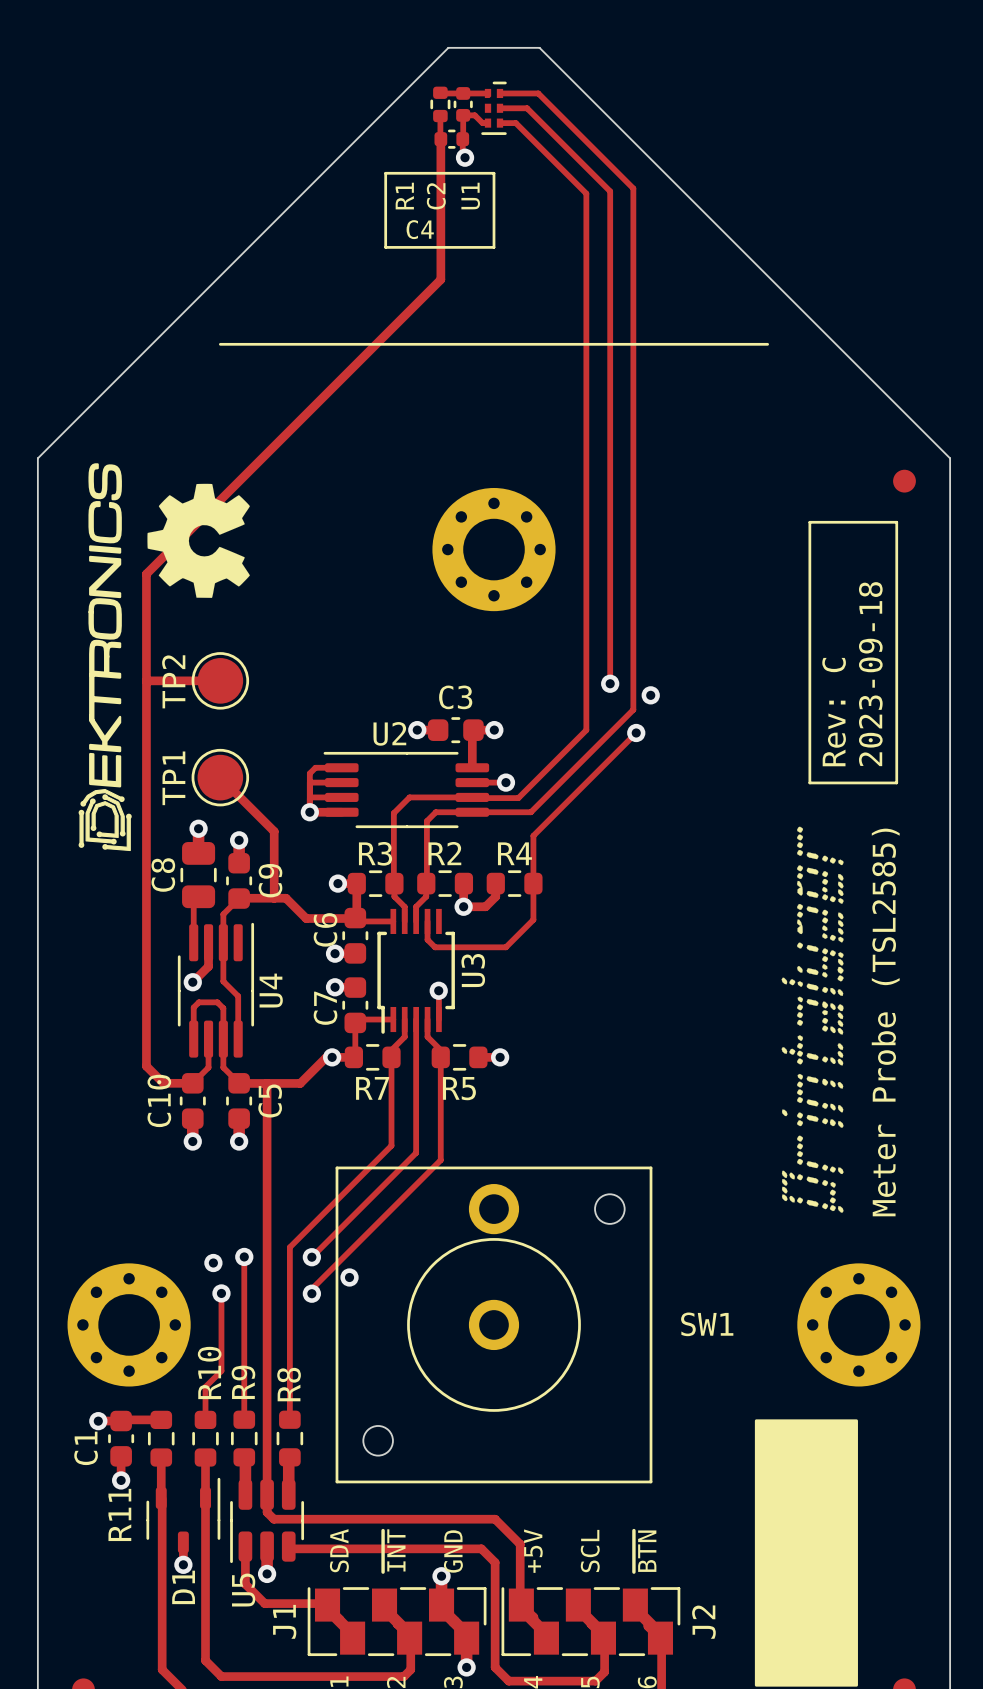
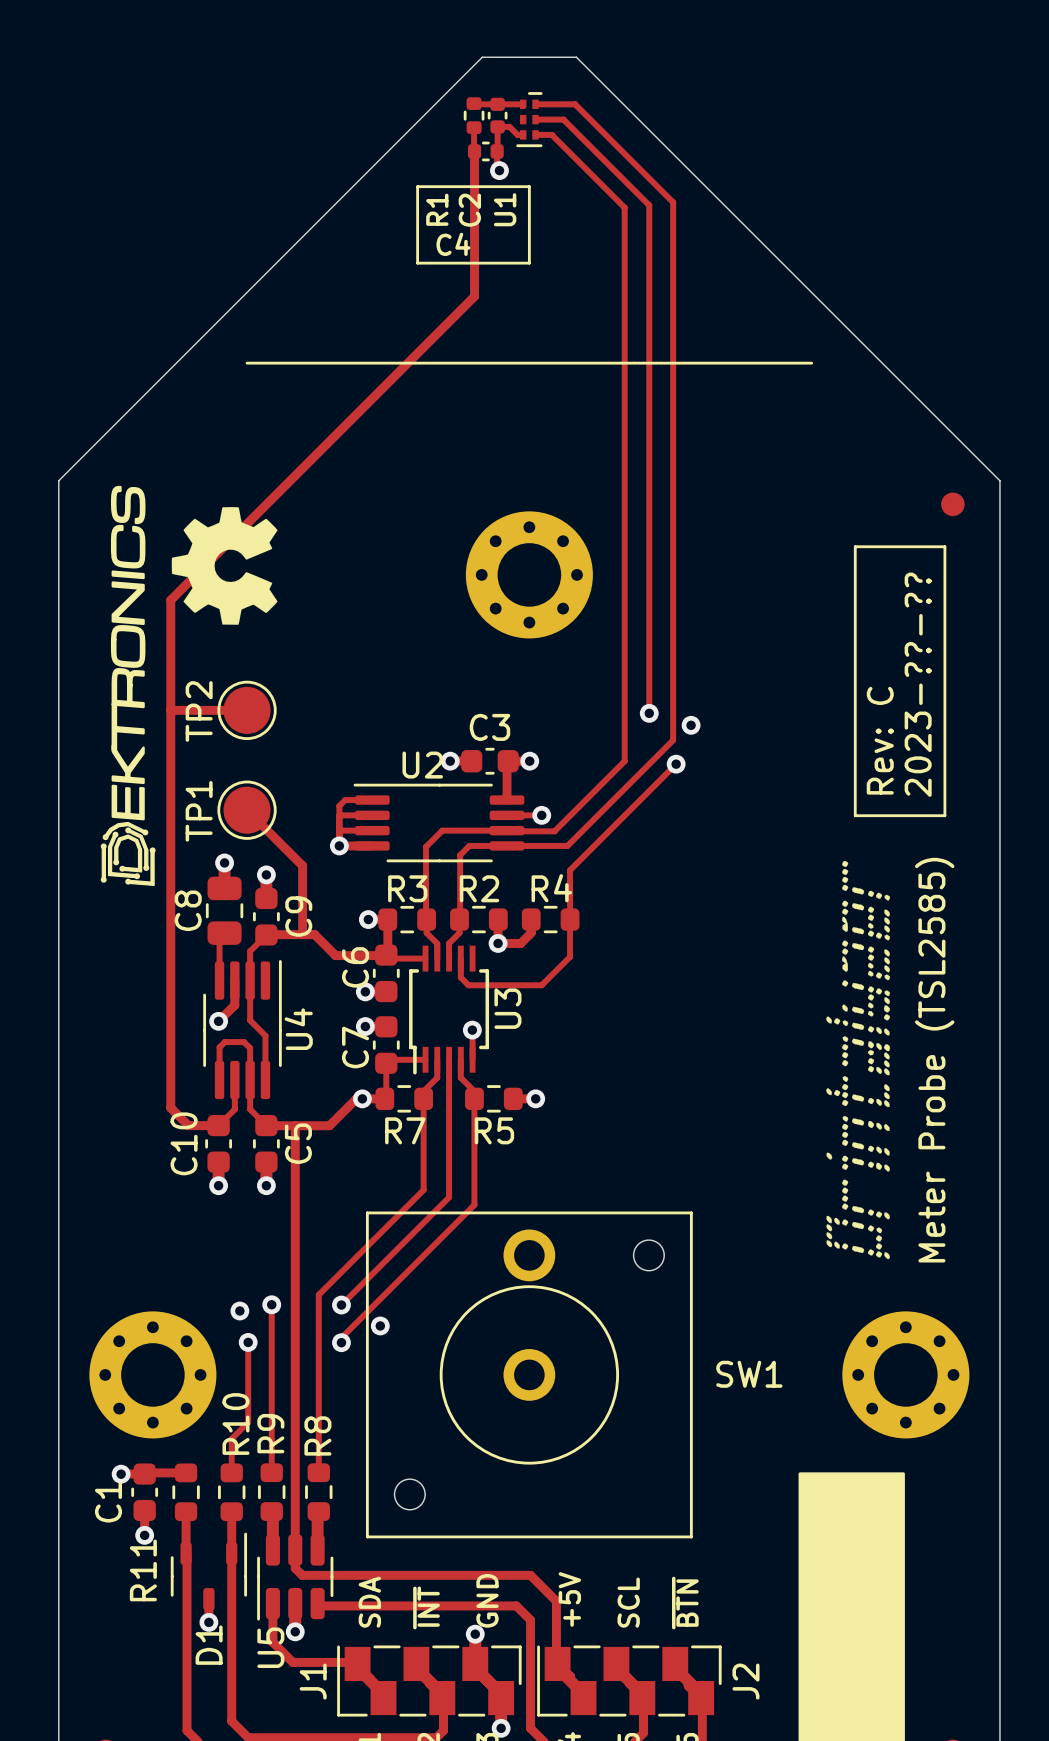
text: 2023-09-18 (870, 674) -> 2023-??-?? (918, 684)

